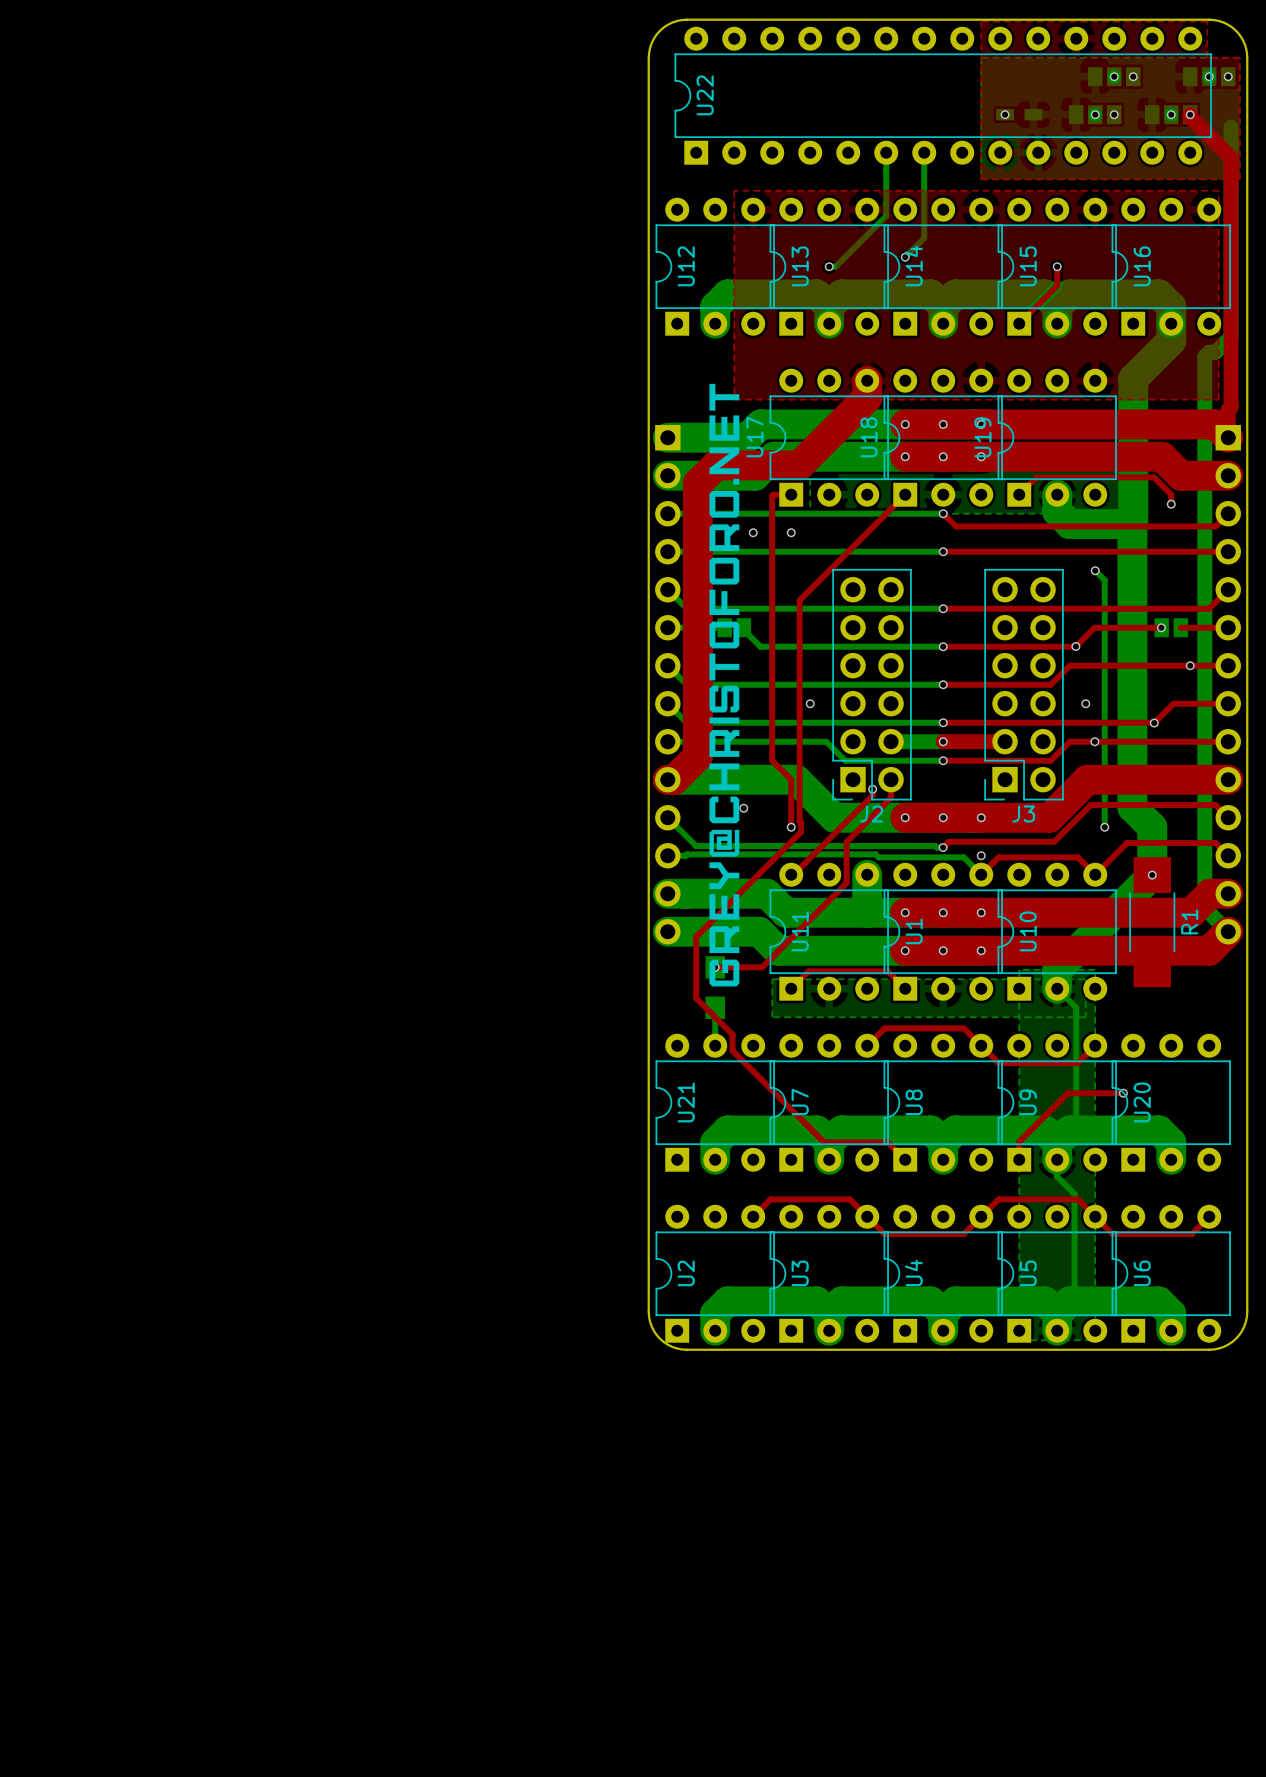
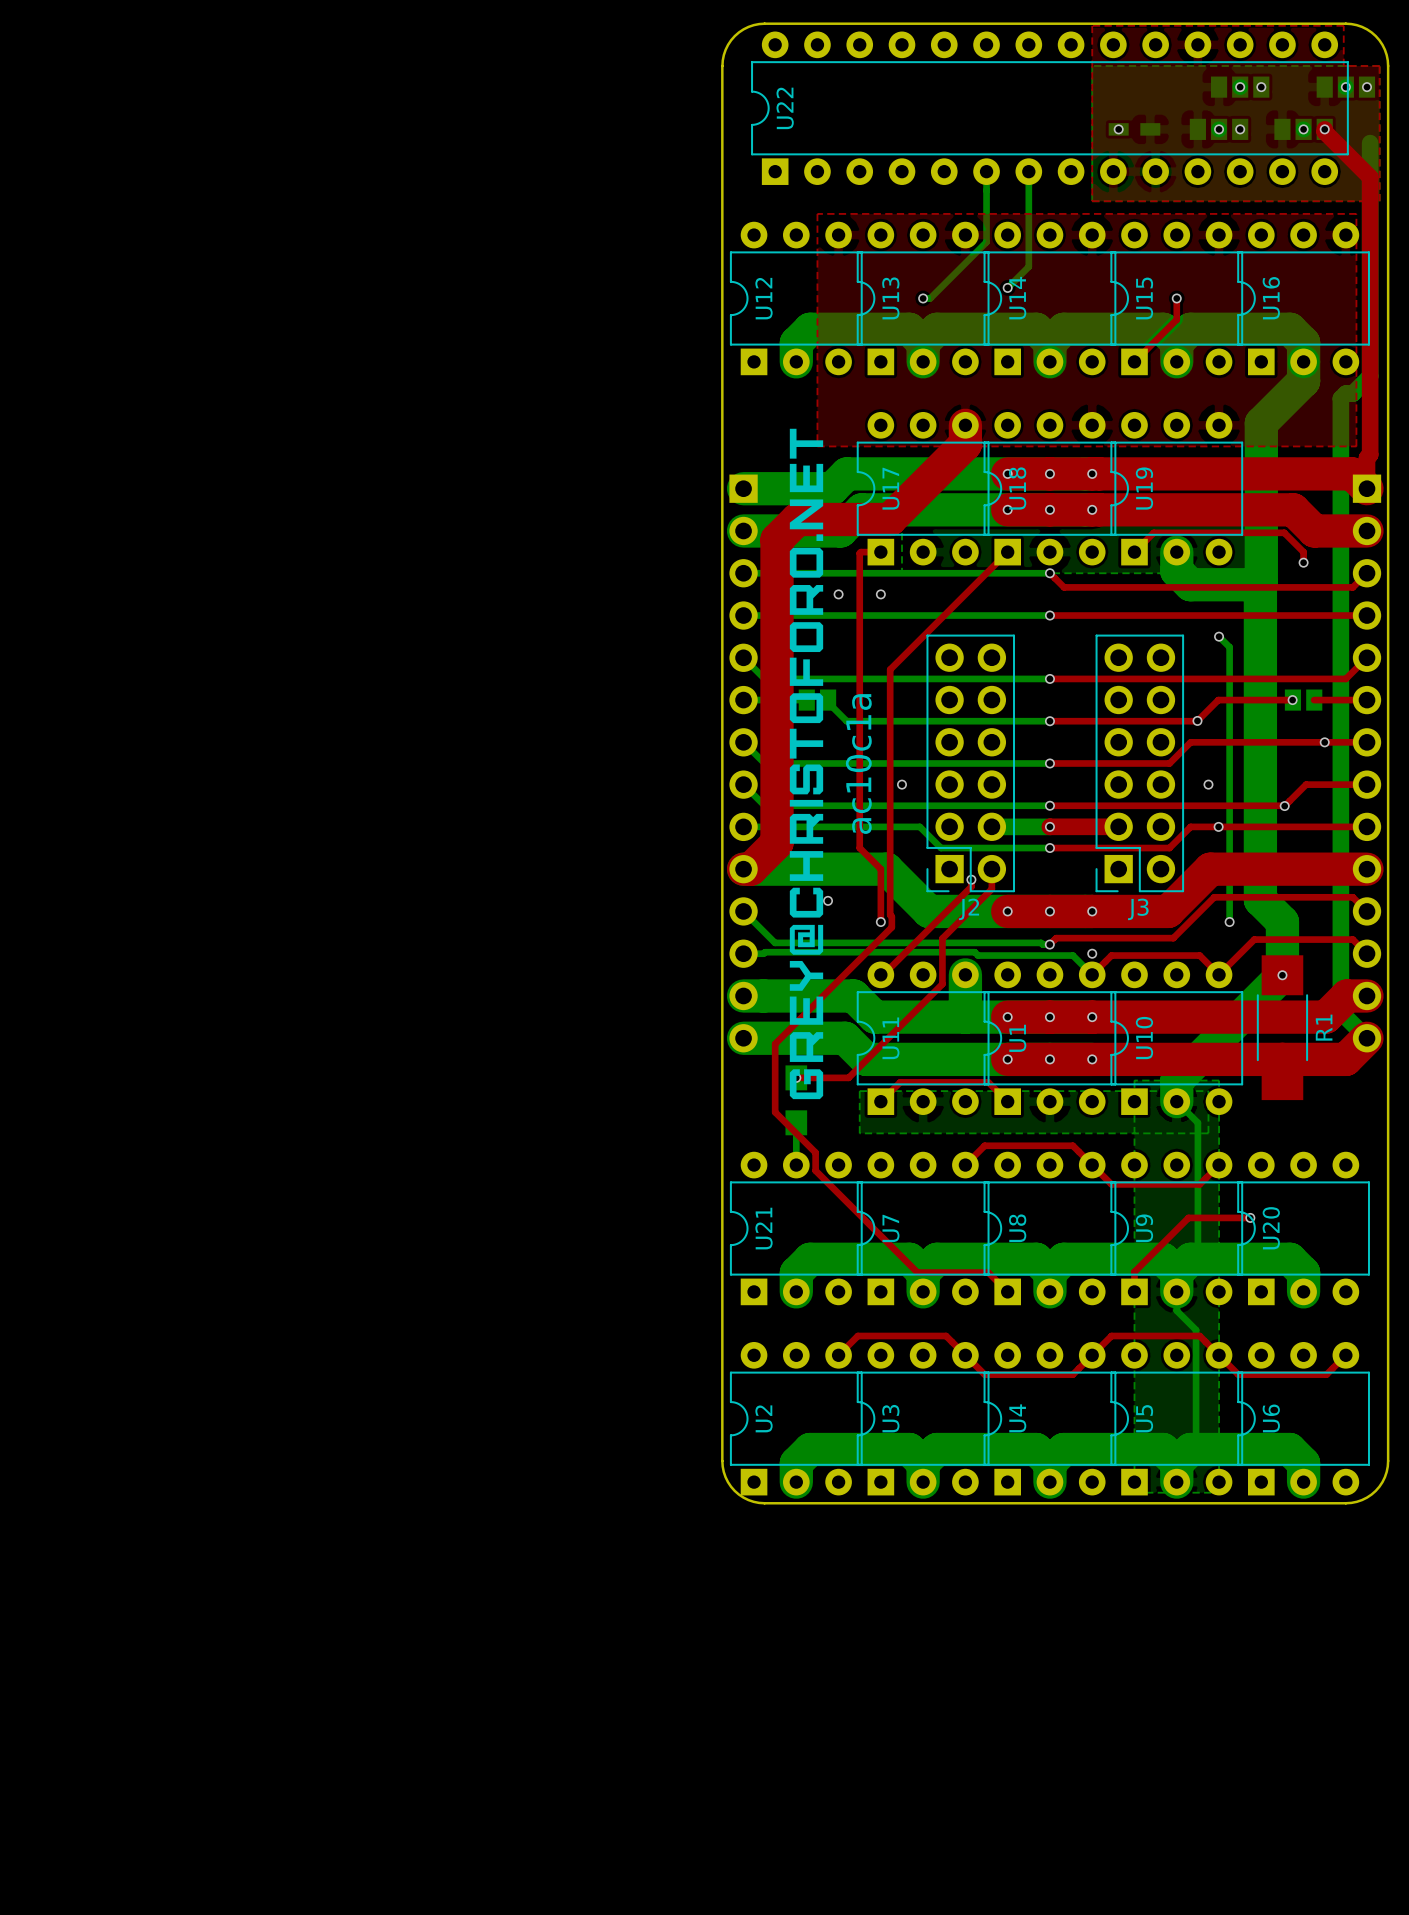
U17 name position: U17 (754, 437) -> U17 (890, 488)
U18 name position: U18 (868, 437) -> U18 (1017, 488)
U19 name position: U19 (982, 437) -> U19 (1144, 488)
text: none -> ac10c1a (858, 764)

